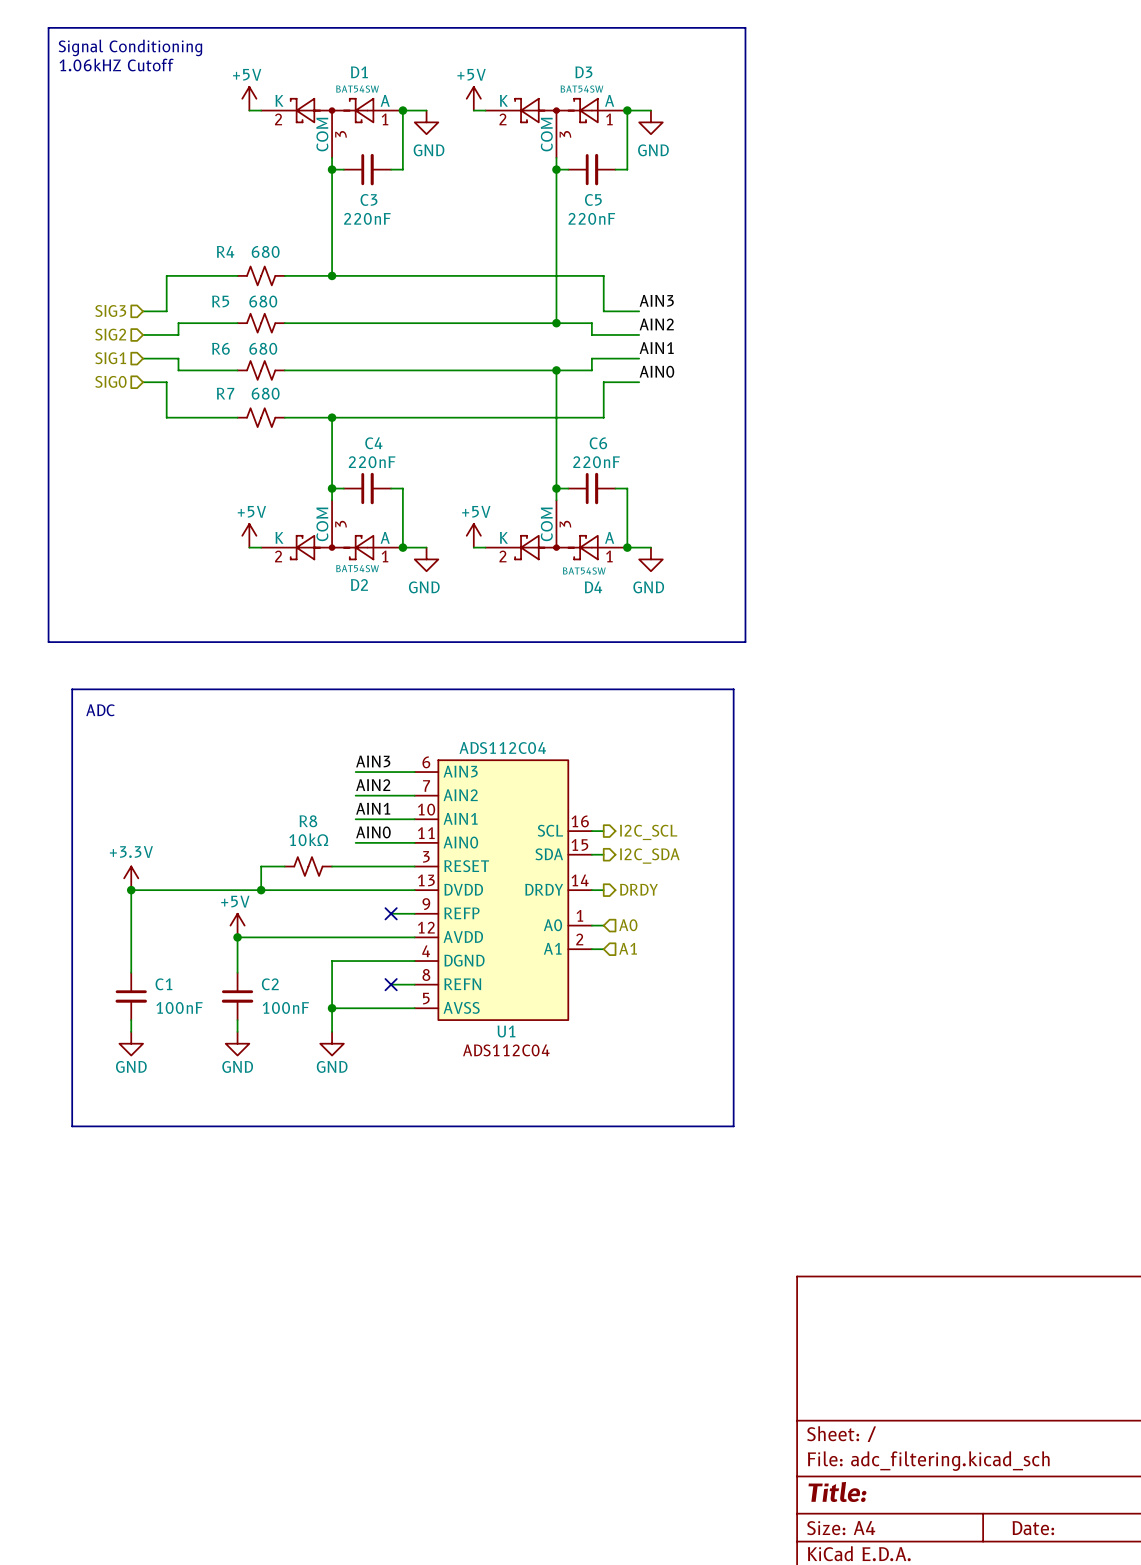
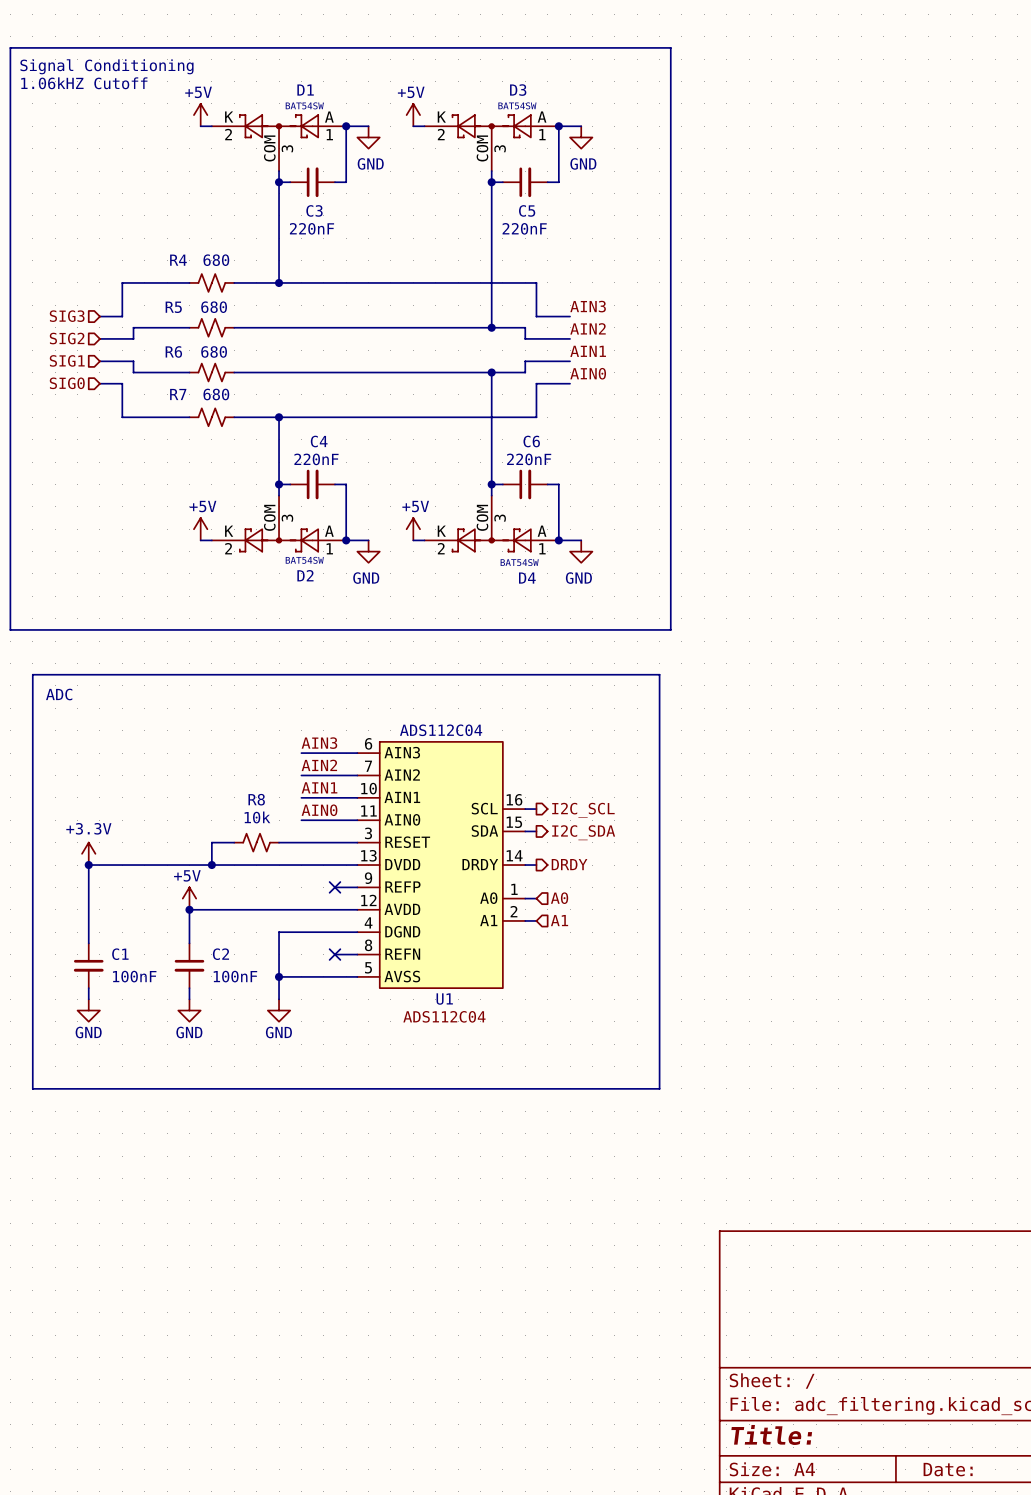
R8 value: 10kΩ (308, 839) -> 10k (257, 817)

